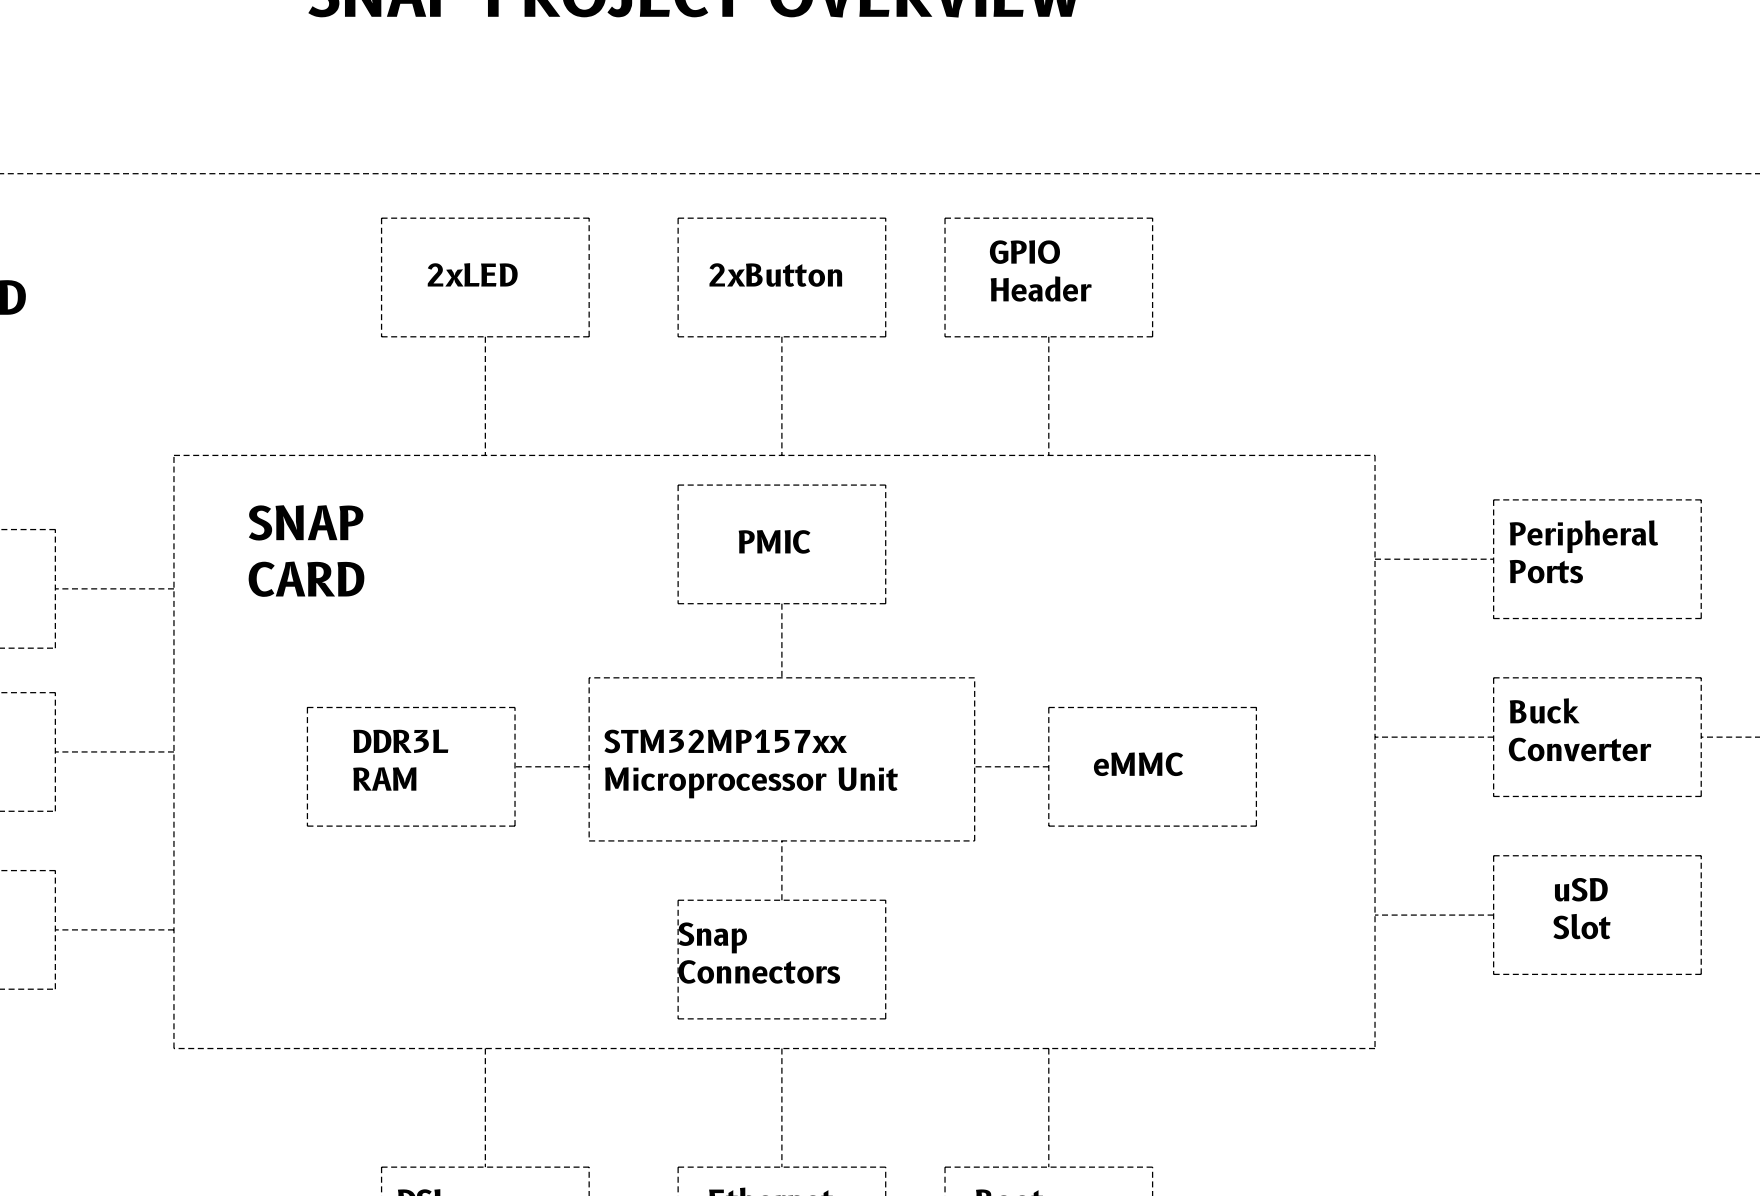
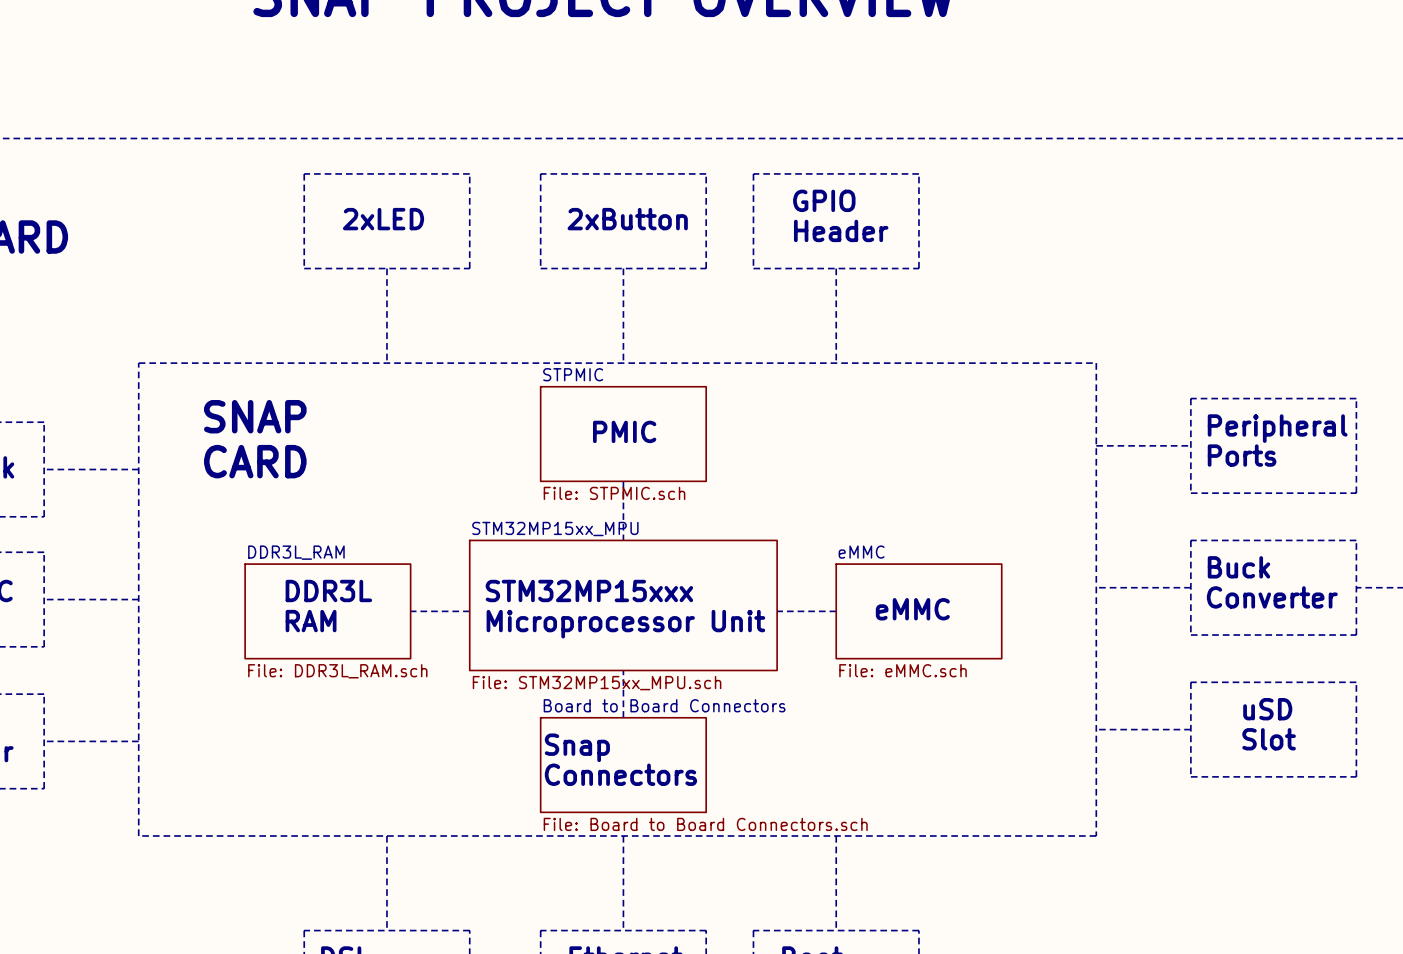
line: (678, 485) (885, 485) (885, 603) (678, 603) (678, 485) -> none
sheet STPMIC: none -> File: STPMIC.sch (623, 434)
line: (589, 677) (589, 840) (974, 840) (974, 677) (589, 677) -> none
line: (307, 707) (515, 707) (515, 826) (307, 826) (307, 707) -> none
line: (1048, 707) (1048, 826) (1256, 826) (1256, 707) (1048, 707) -> none
text: STM32MP157xx (725, 741) -> STM32MP15xxx (589, 590)
sheet STM32MP15xx_MPU: none -> File: STM32MP15xx_MPU.sch (623, 605)
sheet DDR3L_RAM: none -> File: DDR3L_RAM.sch (327, 611)
sheet eMMC: none -> File: eMMC.sch (918, 611)
line: (678, 900) (678, 1018) (885, 1018) (885, 900) (678, 900) -> none
sheet Board to Board Connectors: none -> File: Board to Board Connectors.sch (623, 765)

